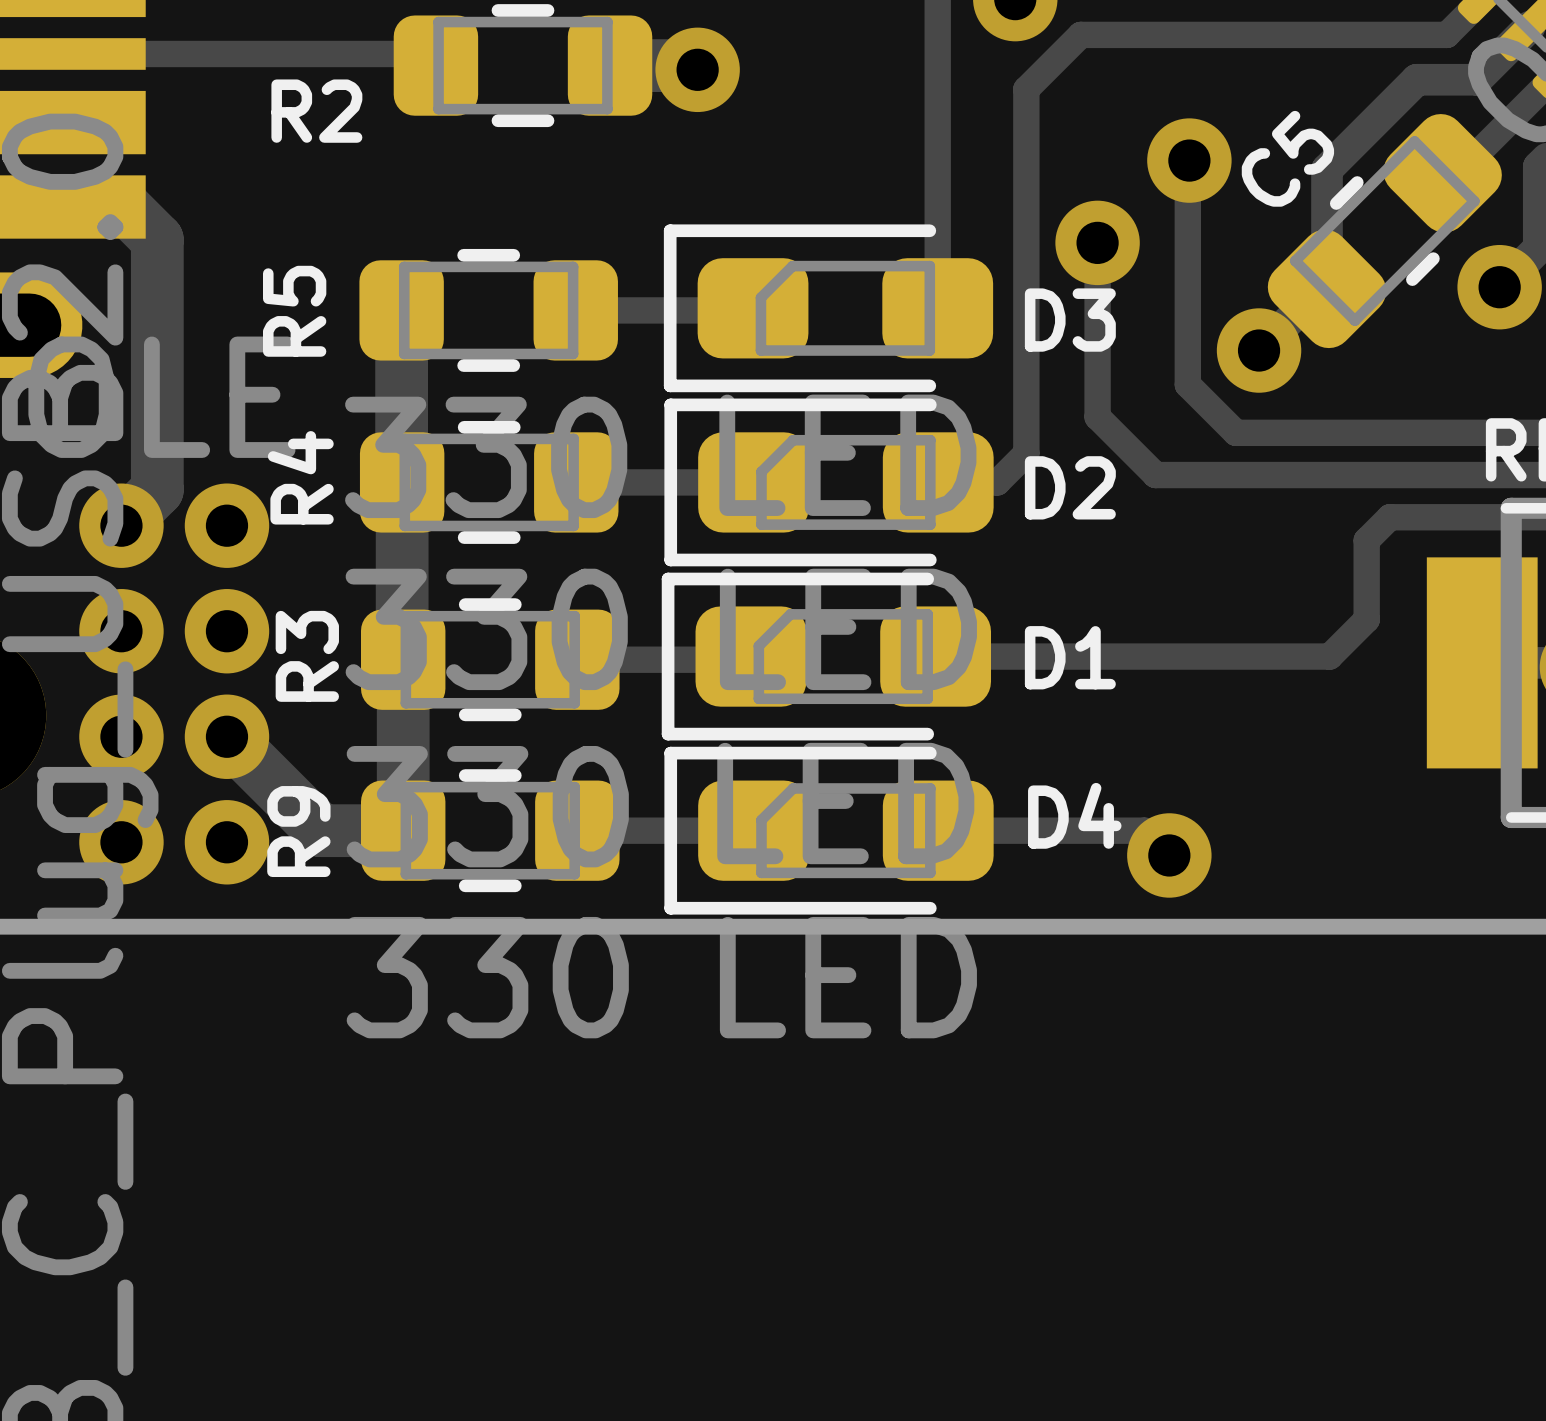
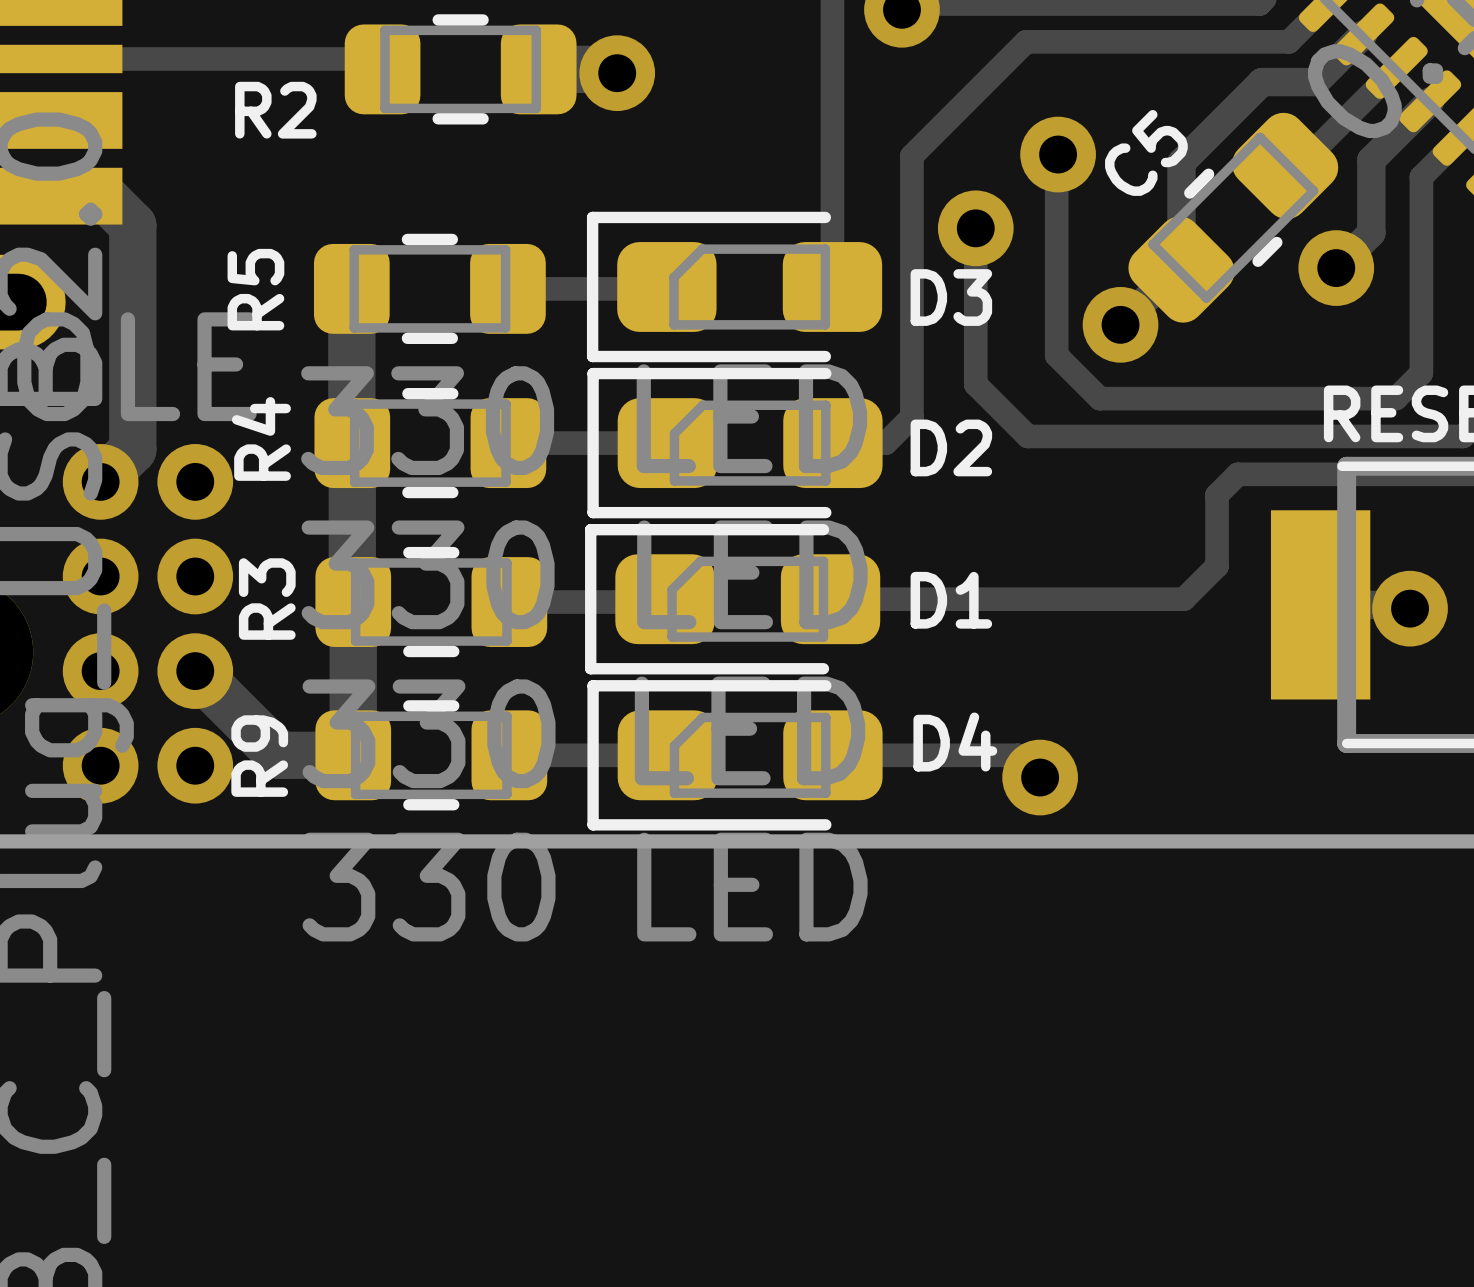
track: (1153, 34) (1080, 34) (1026, 89) (1026, 162) -> (1026, 41) (911, 155)

